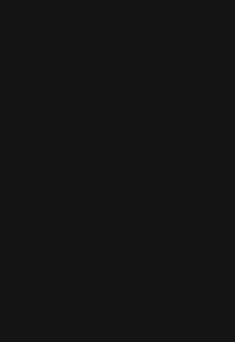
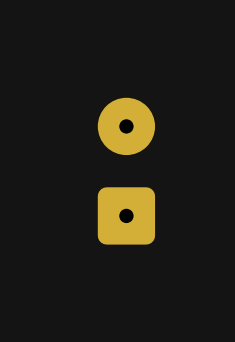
part: none -> (126, 171)

